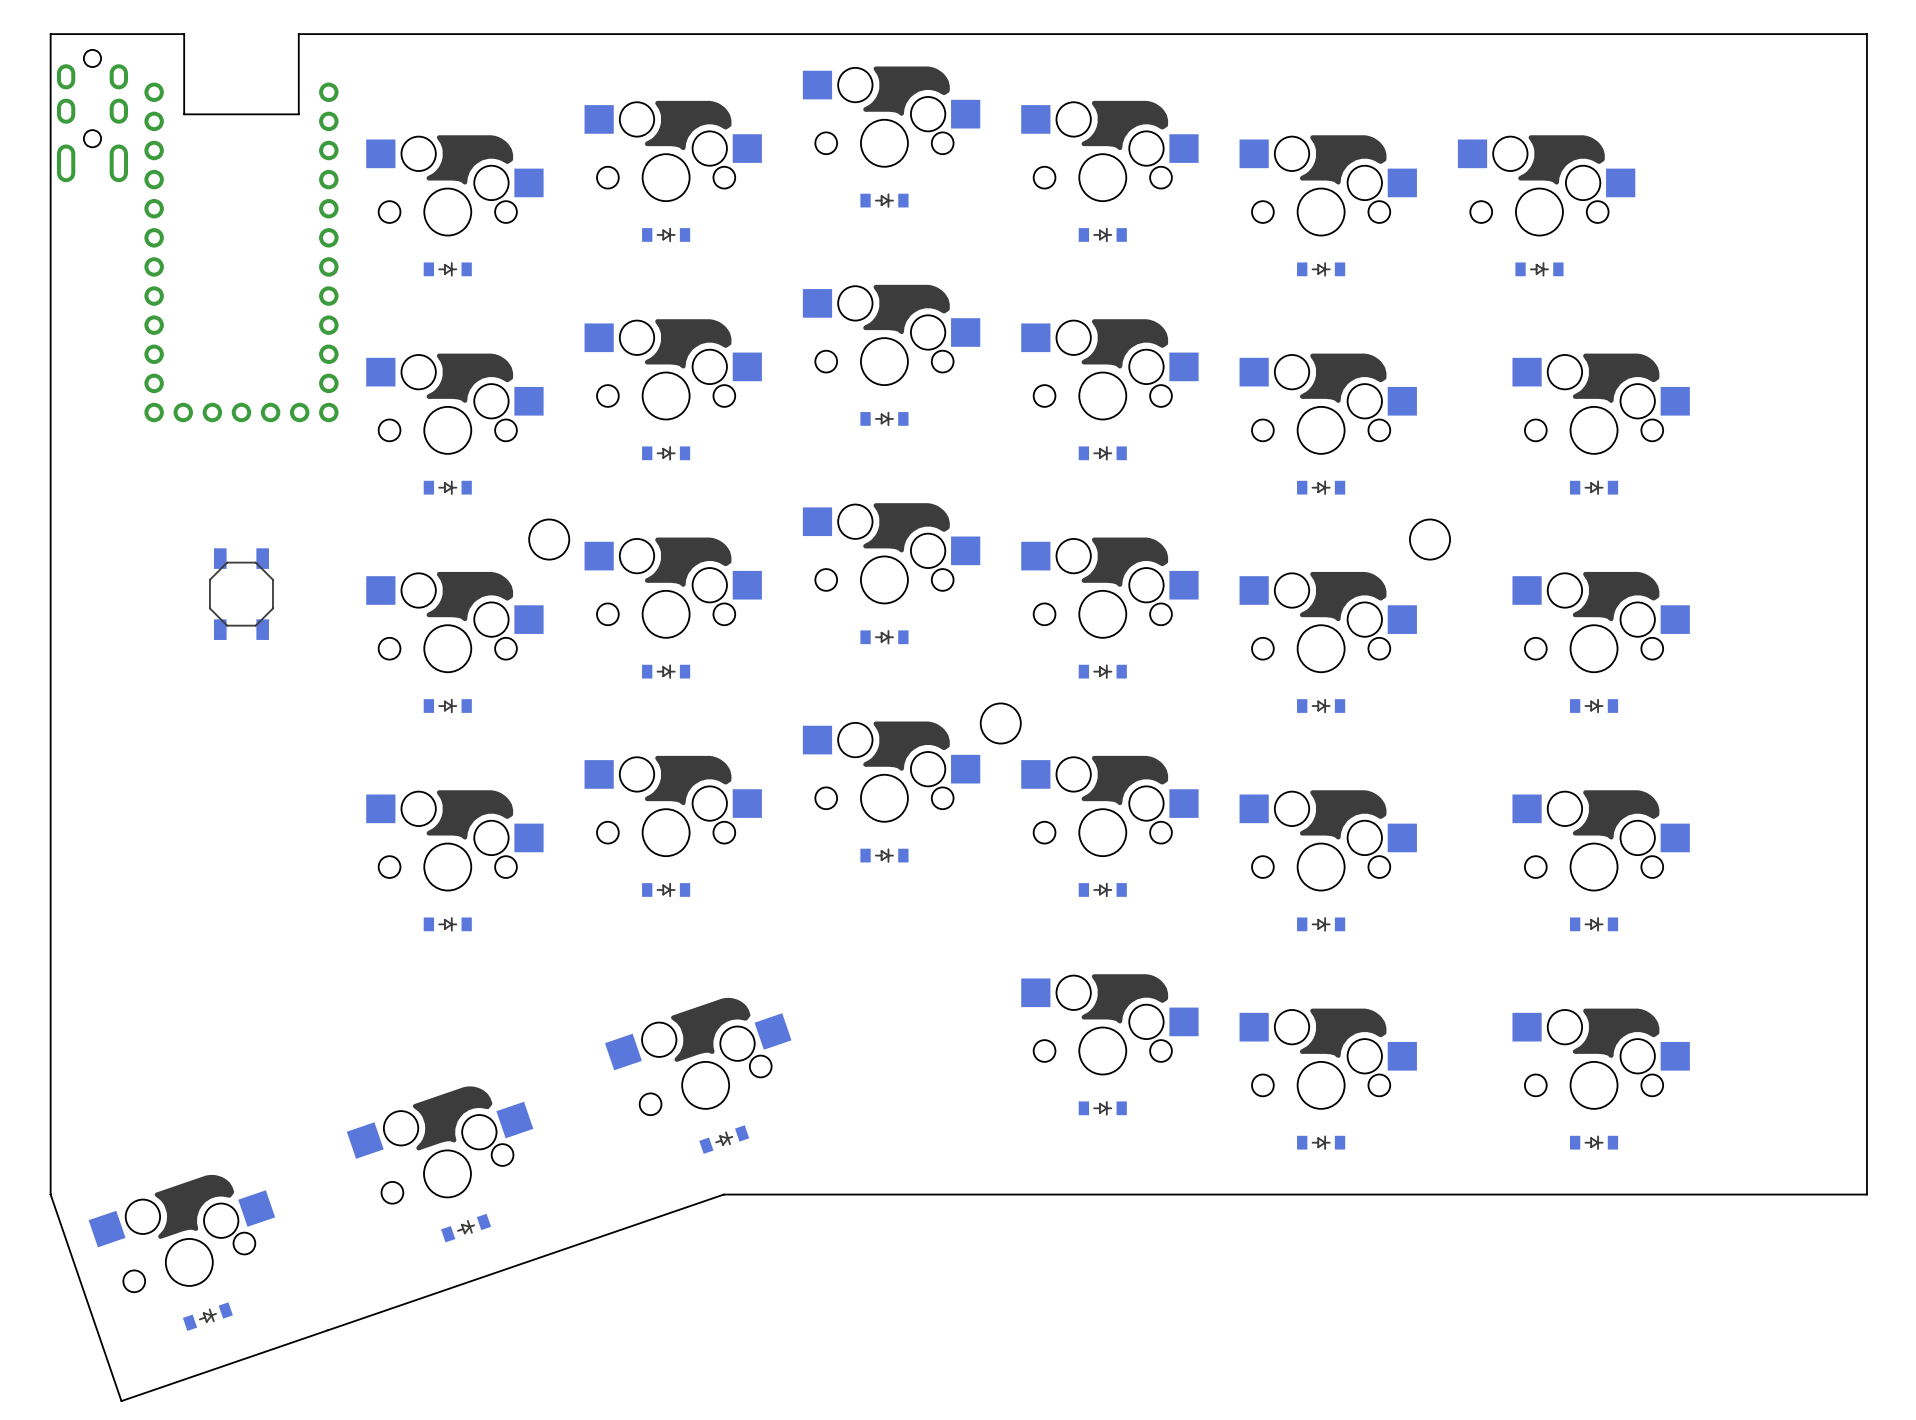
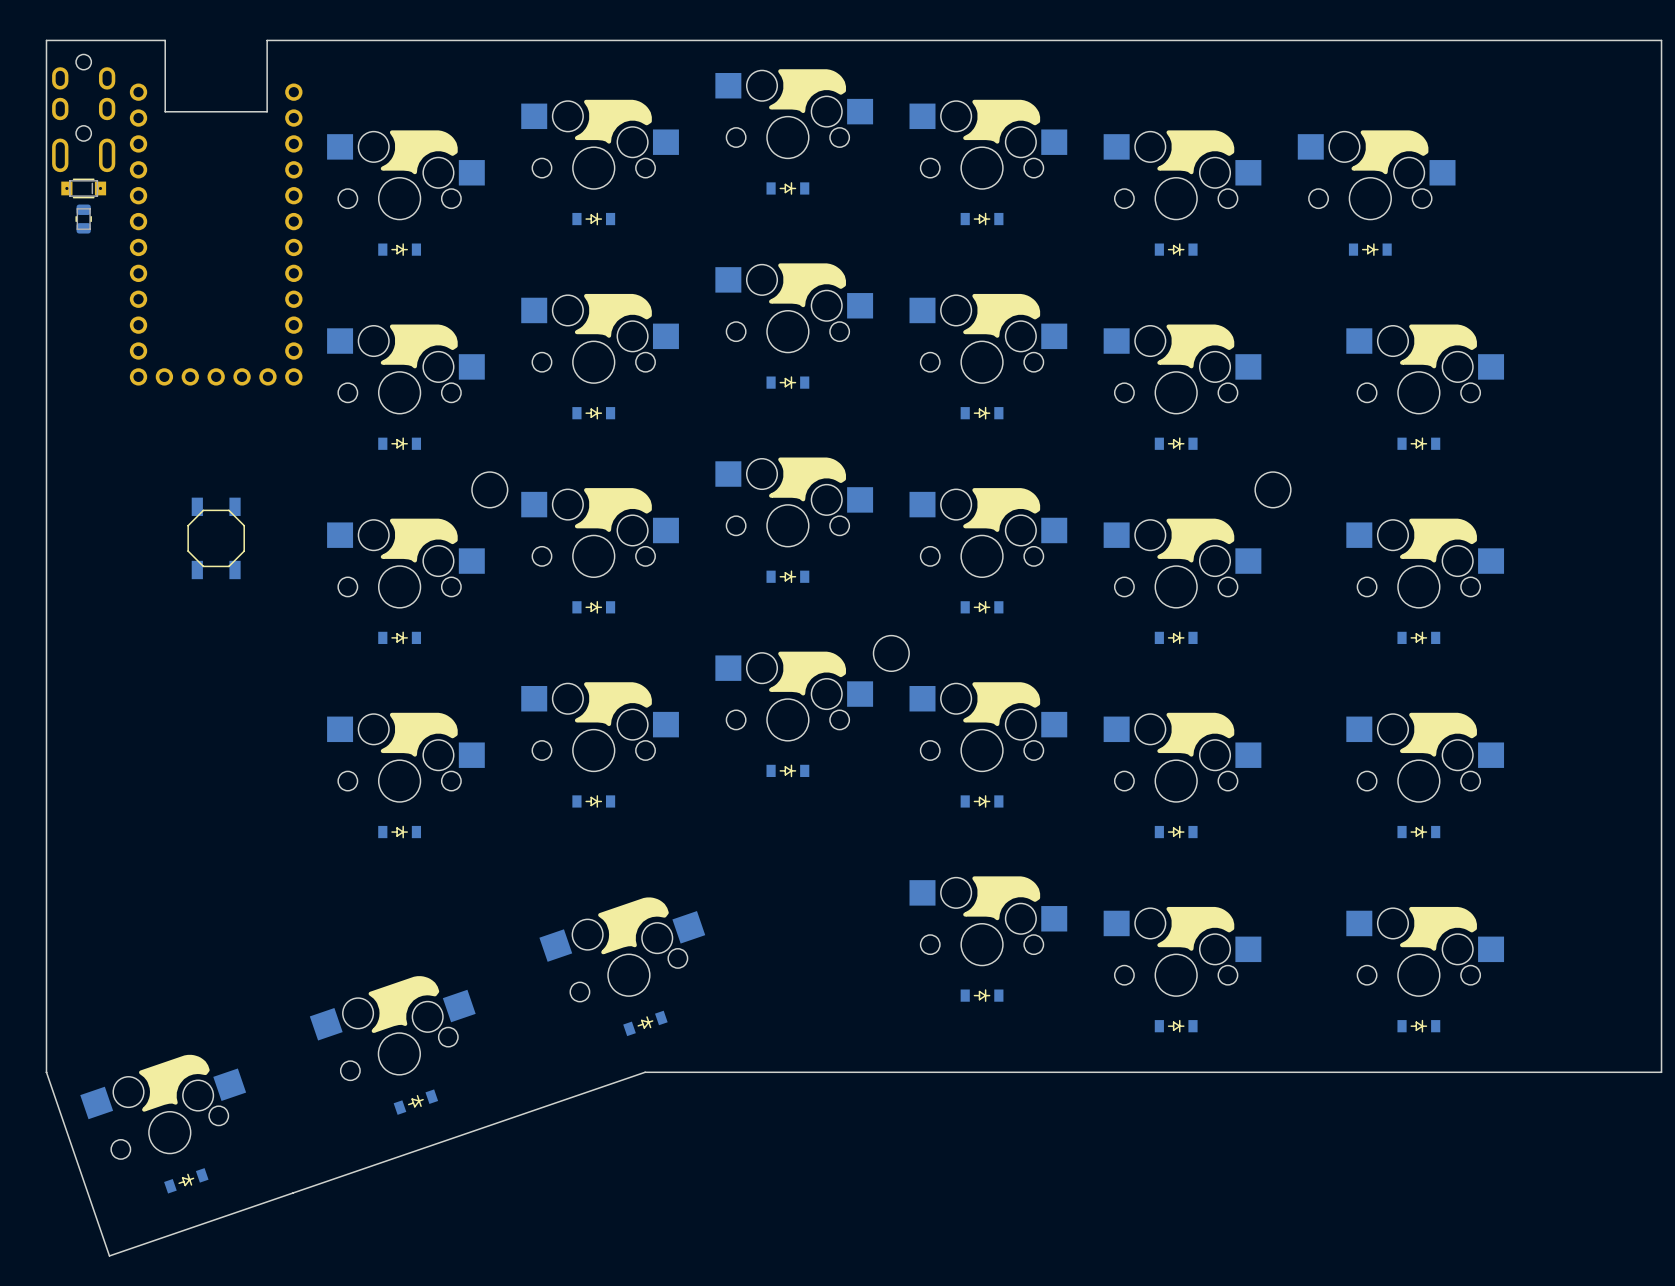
part: none -> (83, 188)
part: none -> (83, 219)

